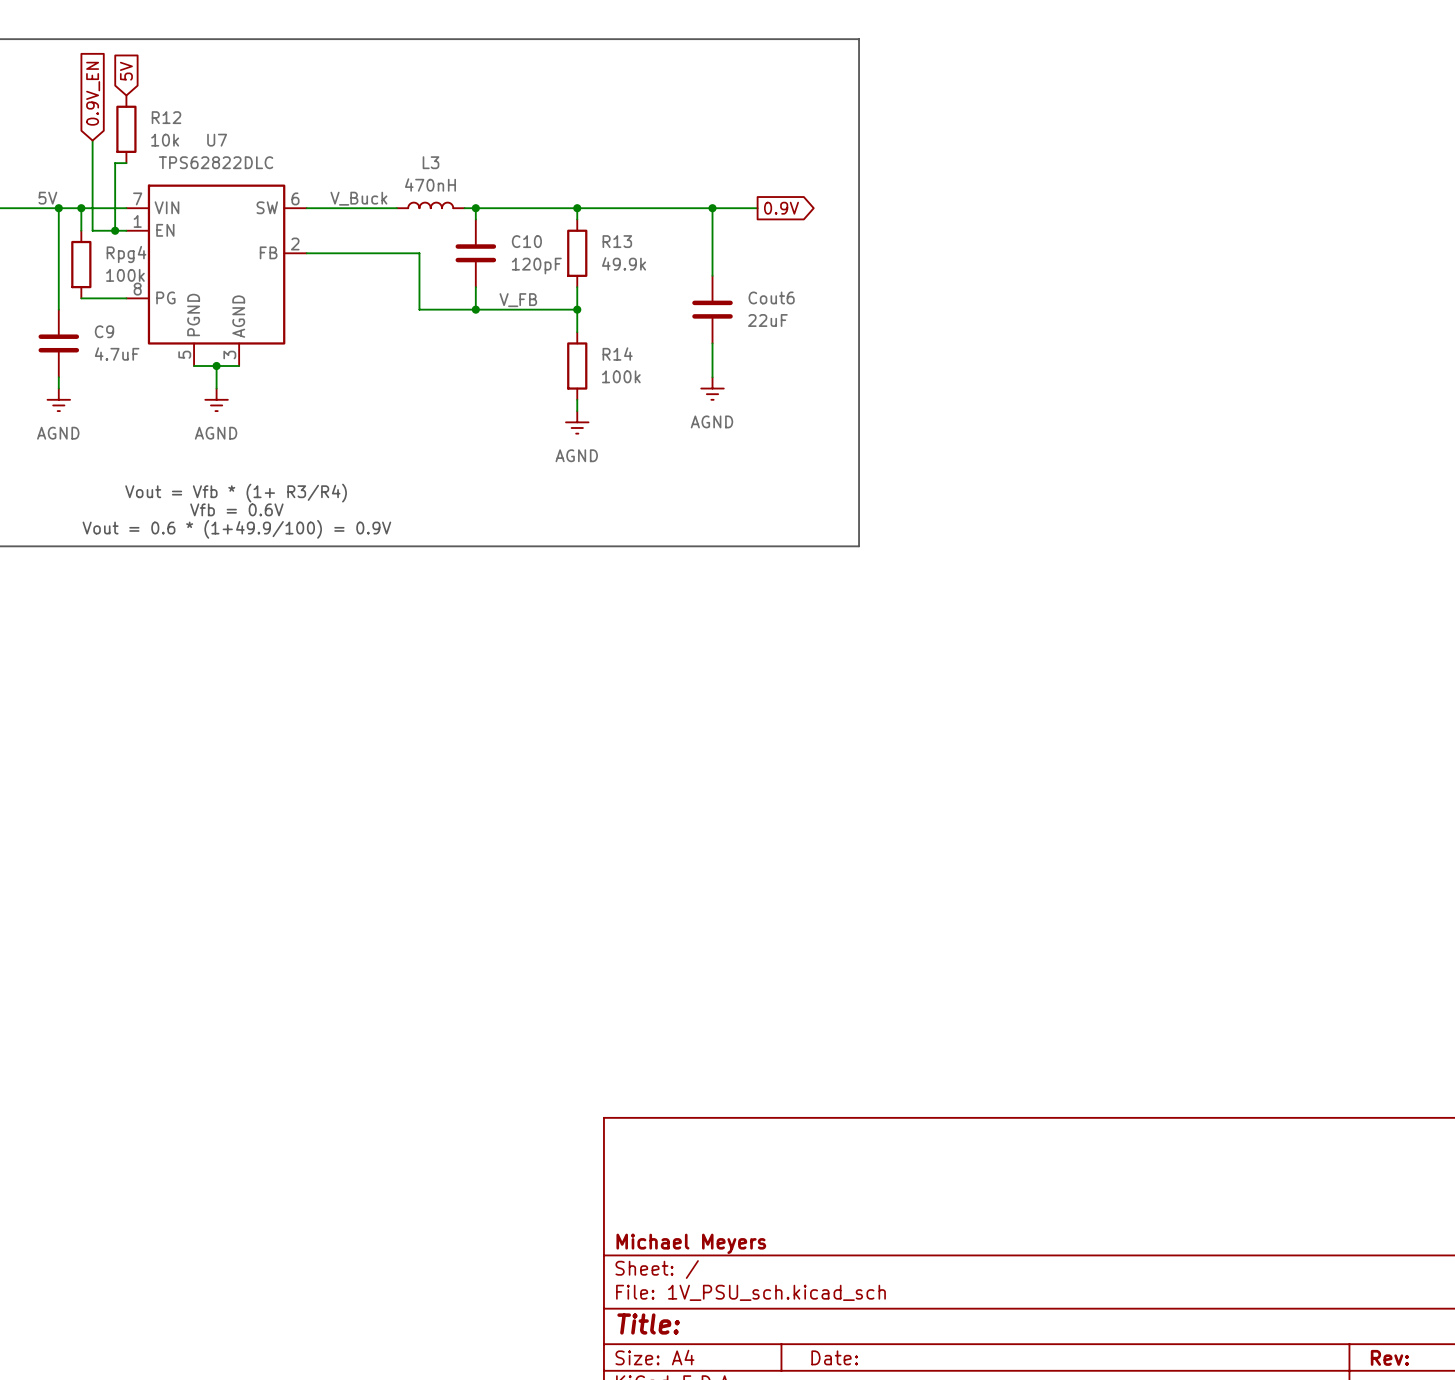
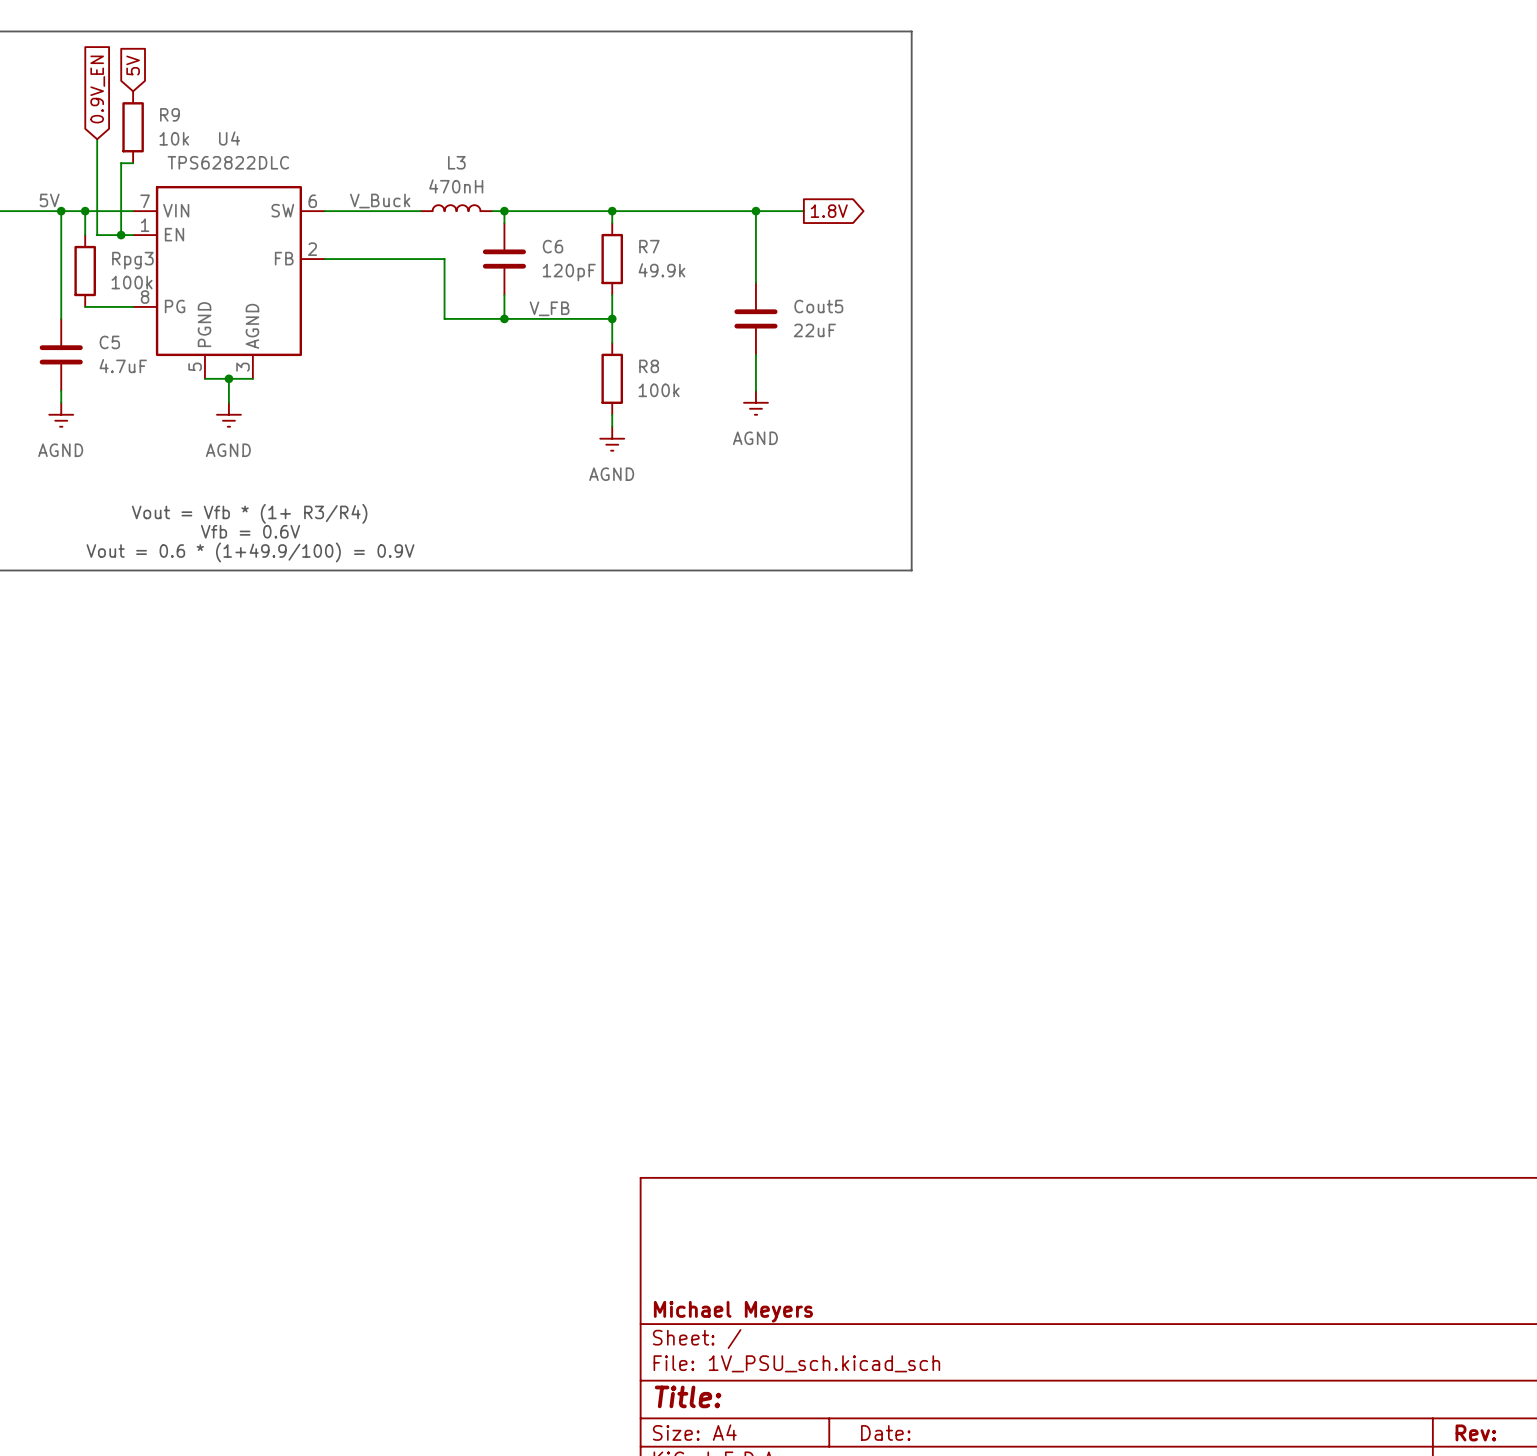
R12 name: R12 (166, 117) -> R9 (169, 114)
U7 name: U7 (217, 140) -> U4 (229, 138)
global label: 0.9V (781, 208) -> 1.8V (829, 211)
C10 name: C10 (526, 241) -> C6 (553, 246)
R13 name: R13 (617, 241) -> R7 (649, 246)
Rpg4 name: Rpg4 (126, 254) -> Rpg3 (132, 260)
Cout6 name: Cout6 (771, 297) -> Cout5 (818, 306)
C9 name: C9 (104, 331) -> C5 (109, 342)
R14 name: R14 (617, 354) -> R8 (649, 366)

